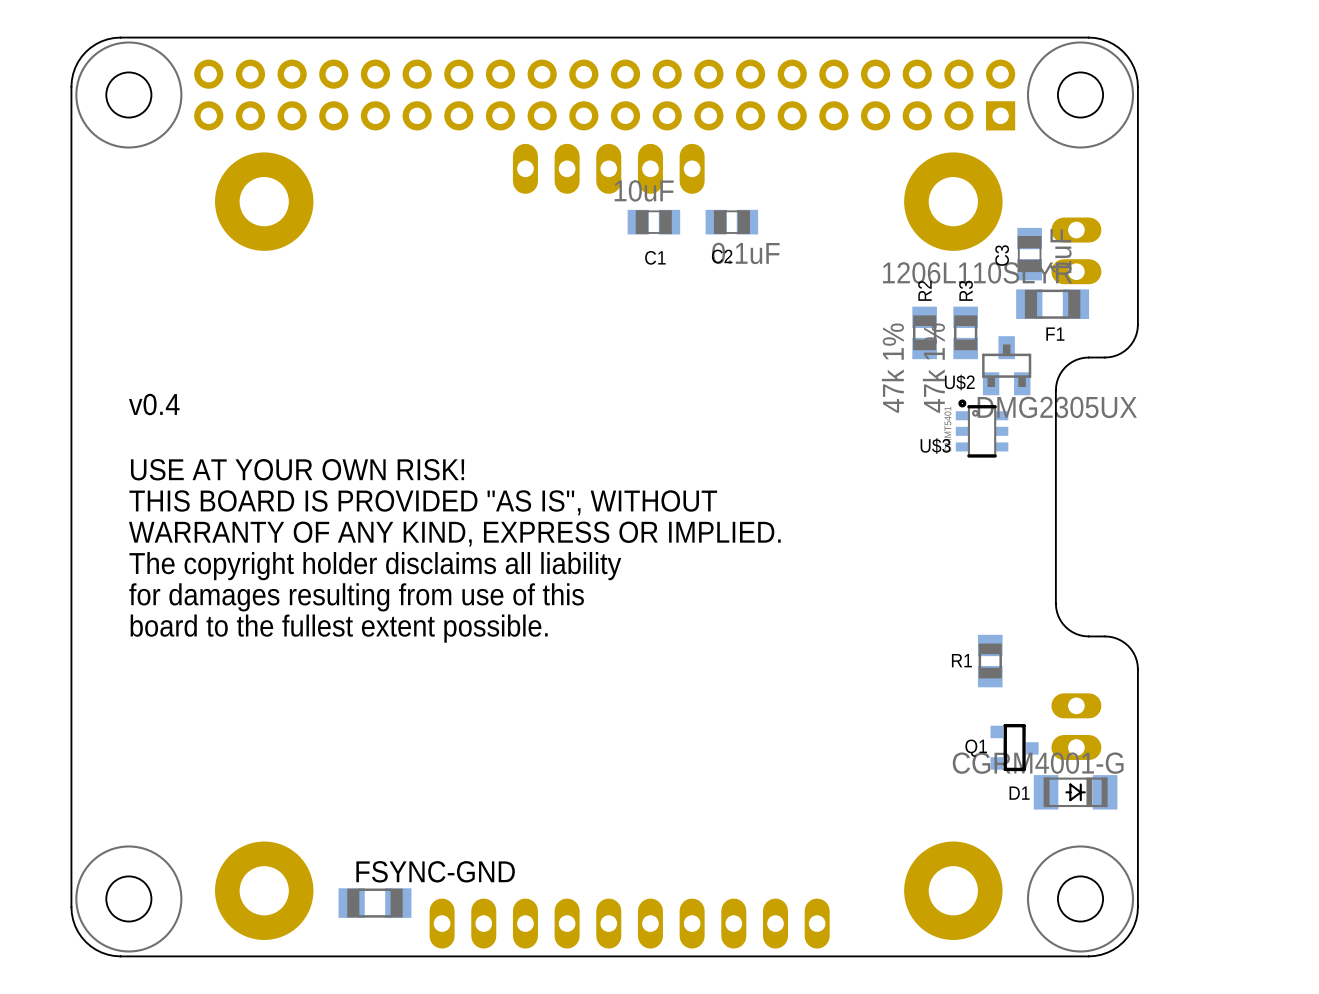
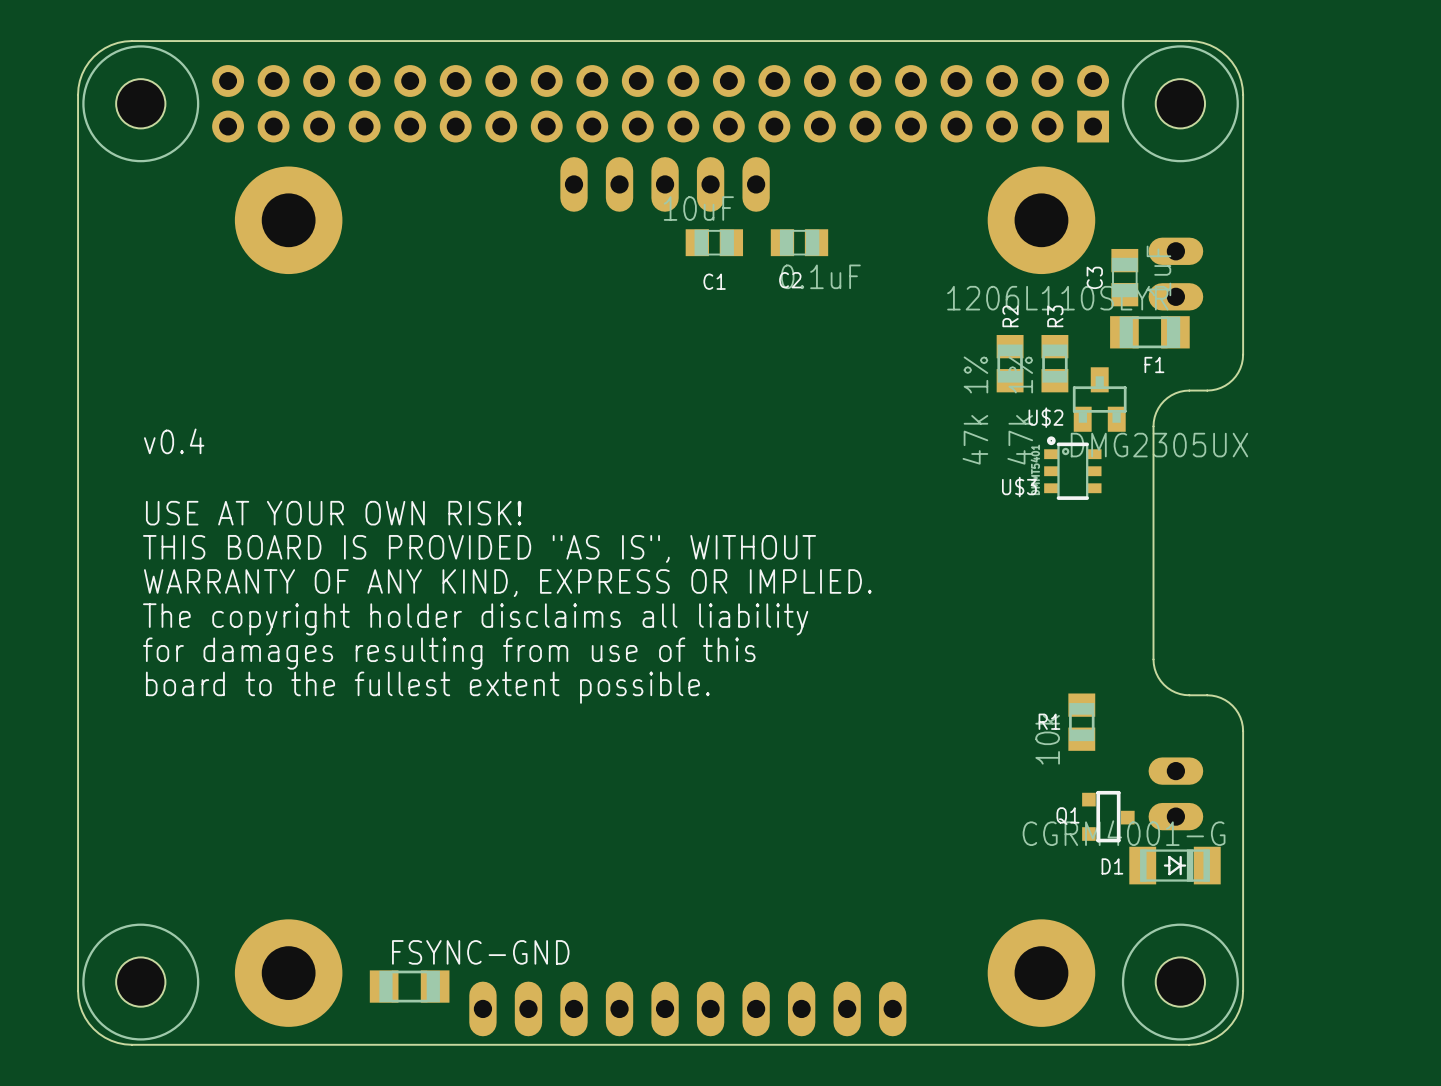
R1 value: none -> 10k (1047, 739)

